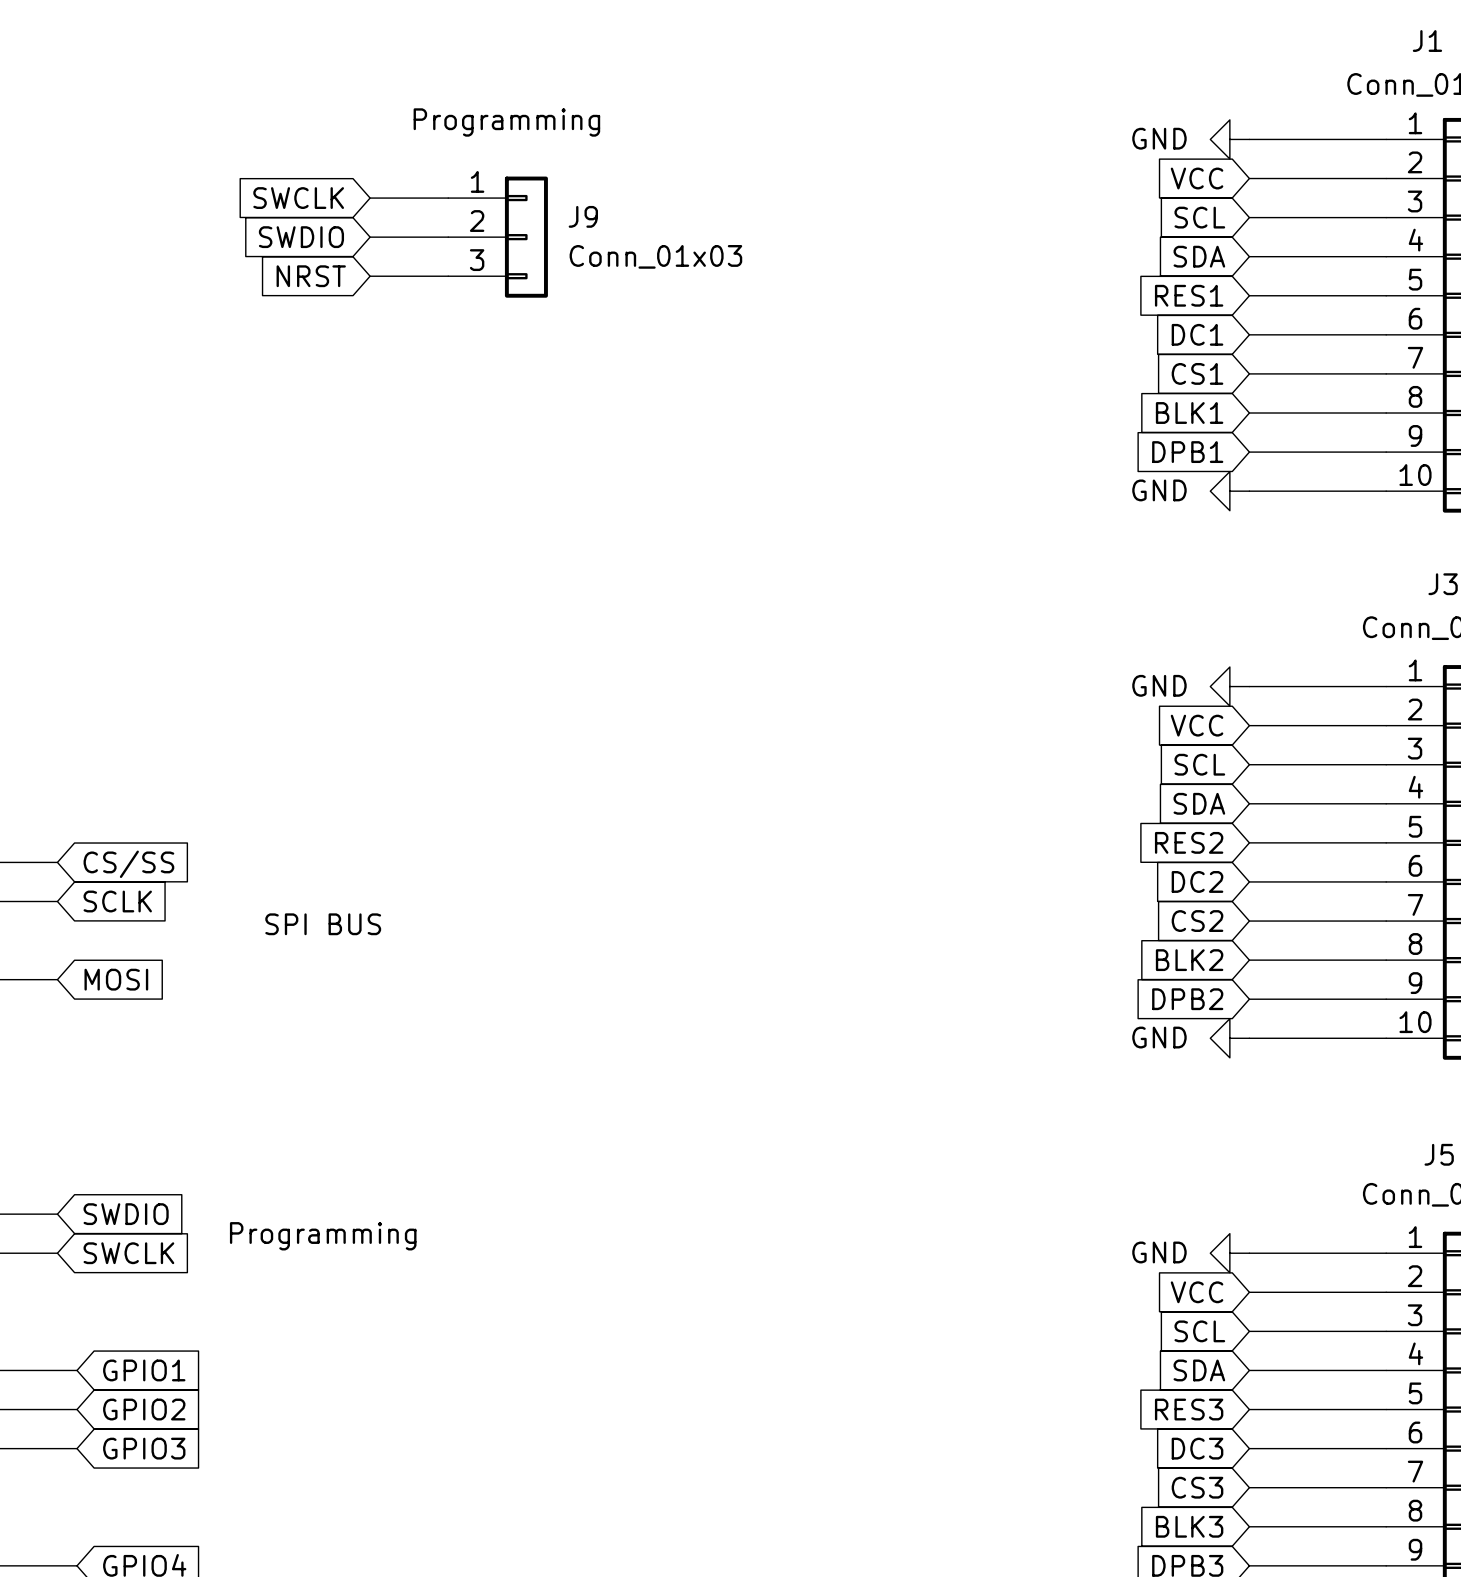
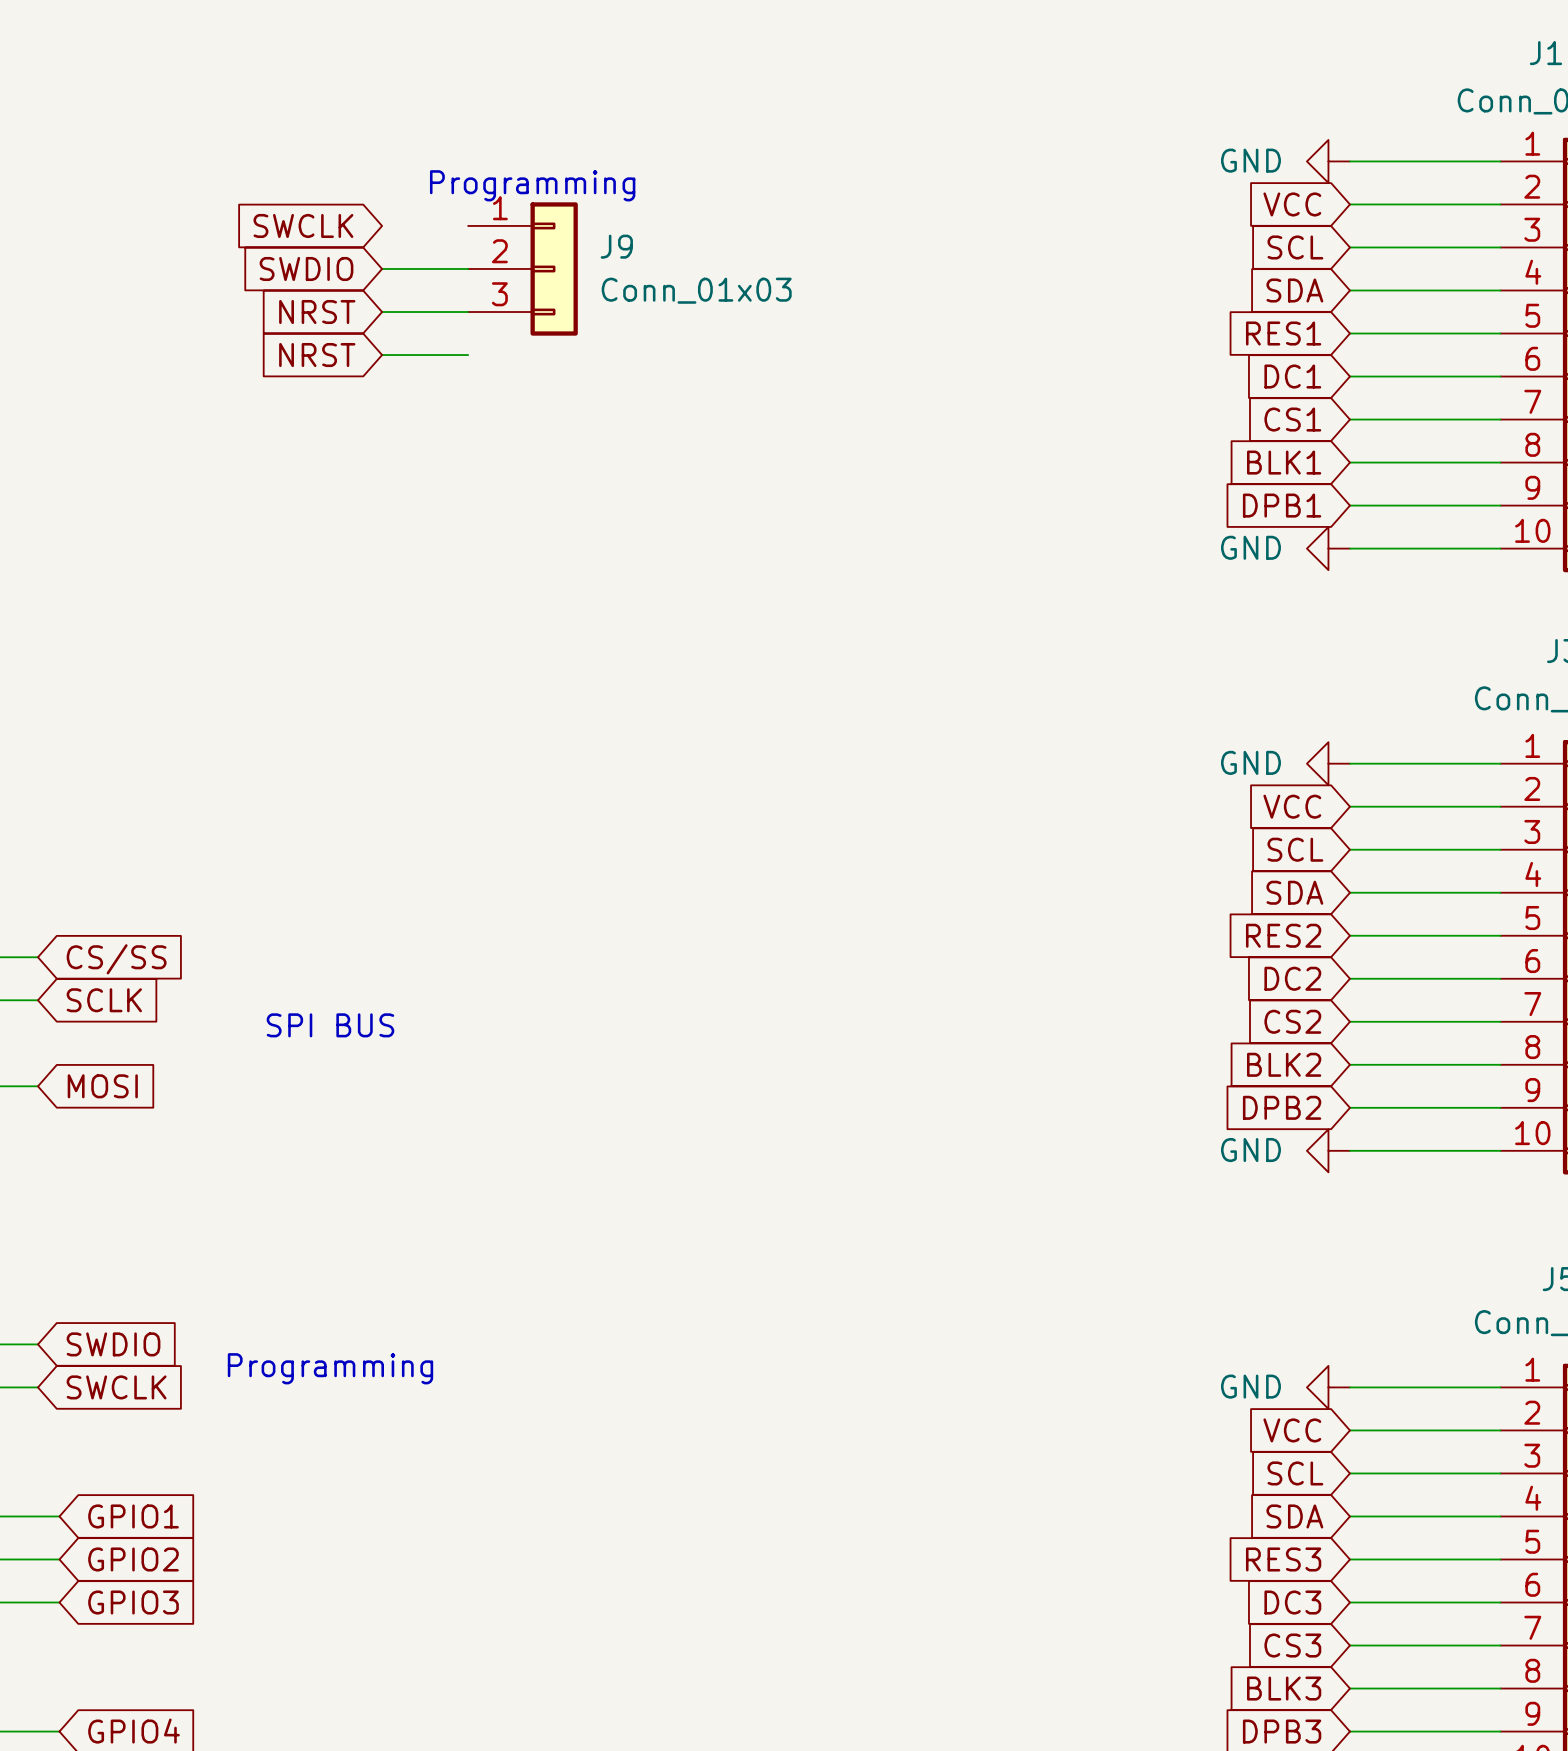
text position: Programming (506, 122) -> Programming (532, 185)
wire: (370, 198) (448, 198) -> (382, 355) (468, 355)
global label: none -> NRST (317, 355)

